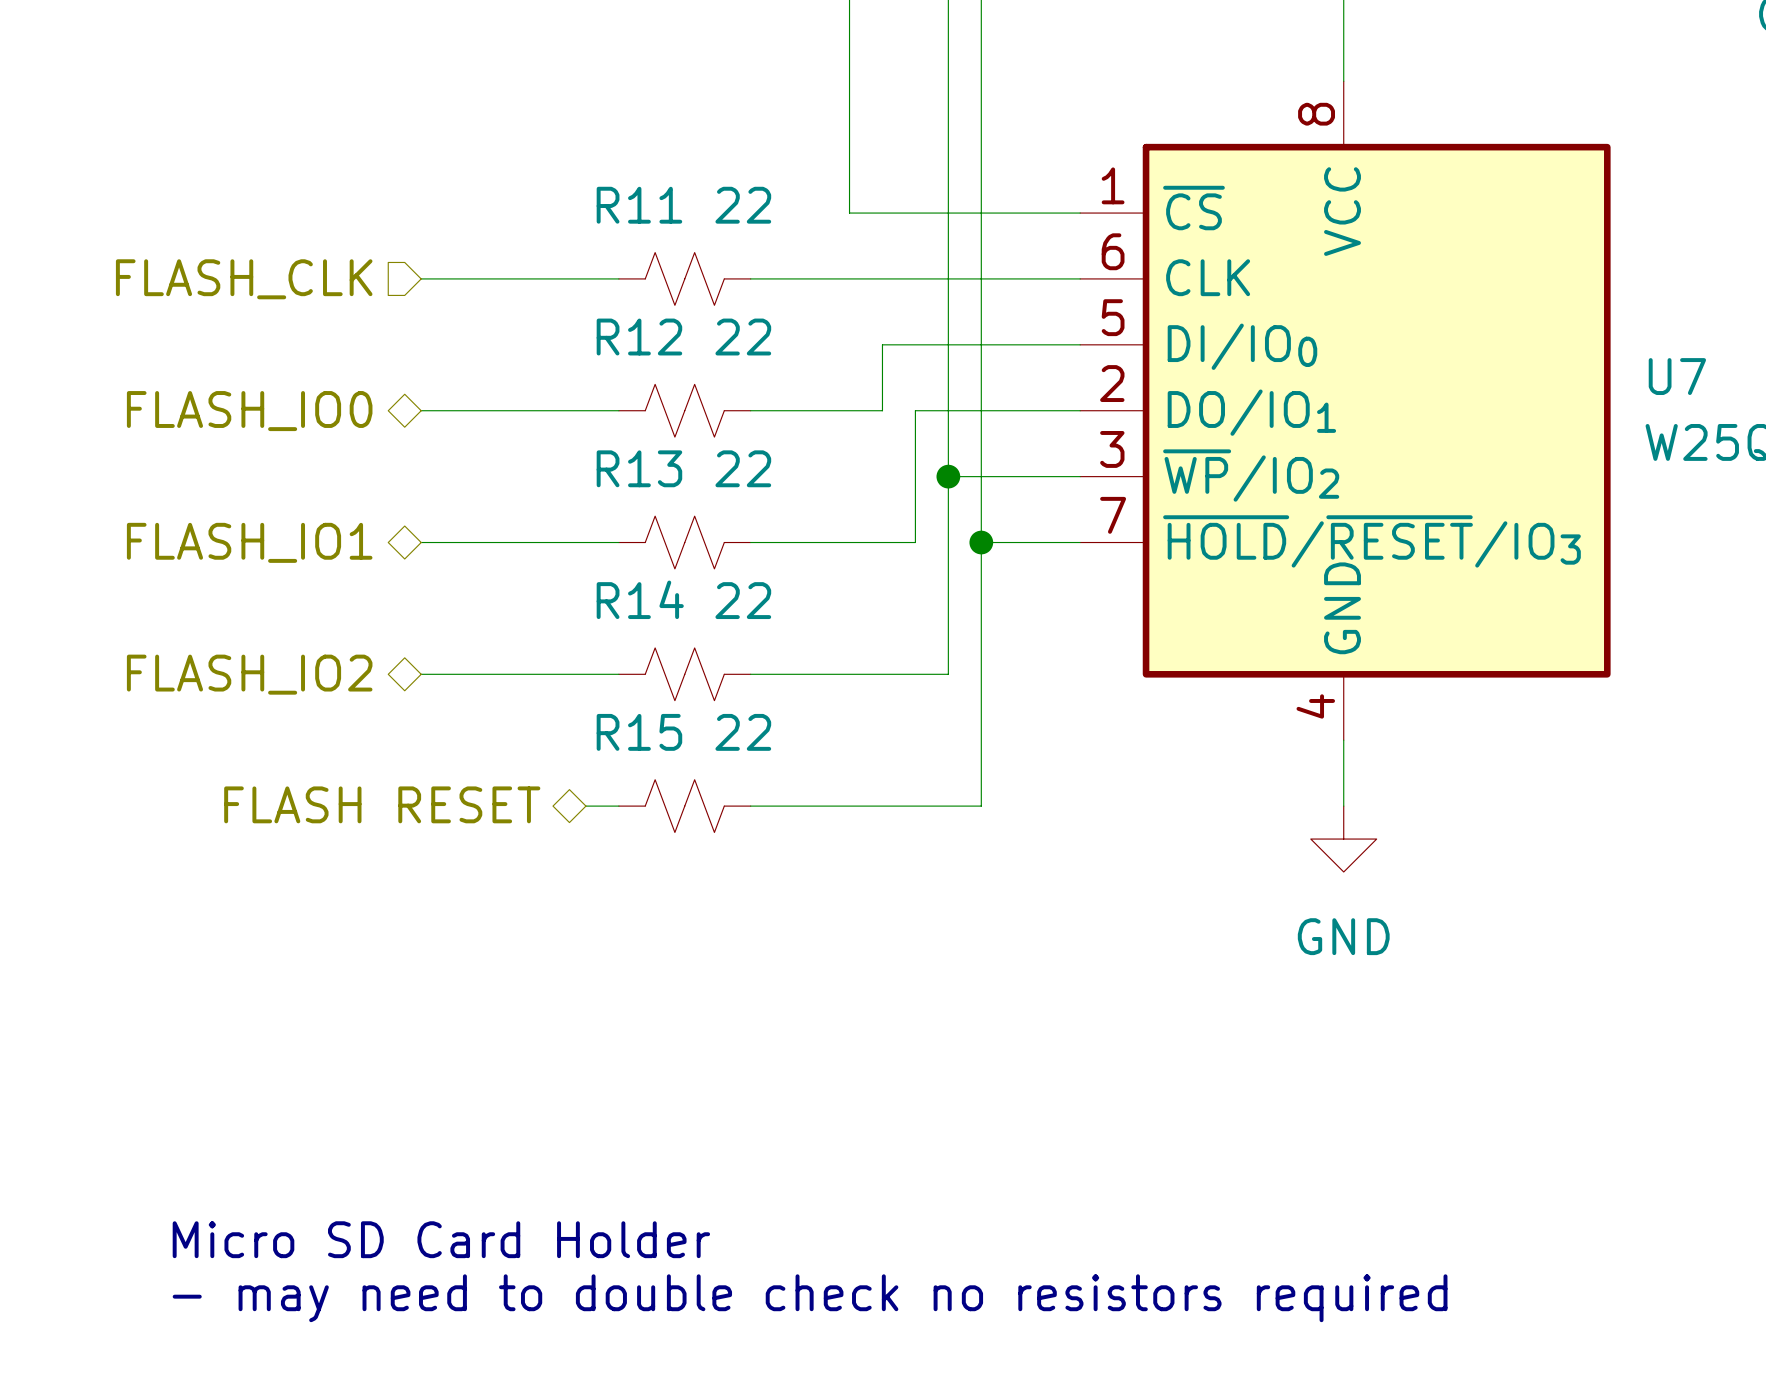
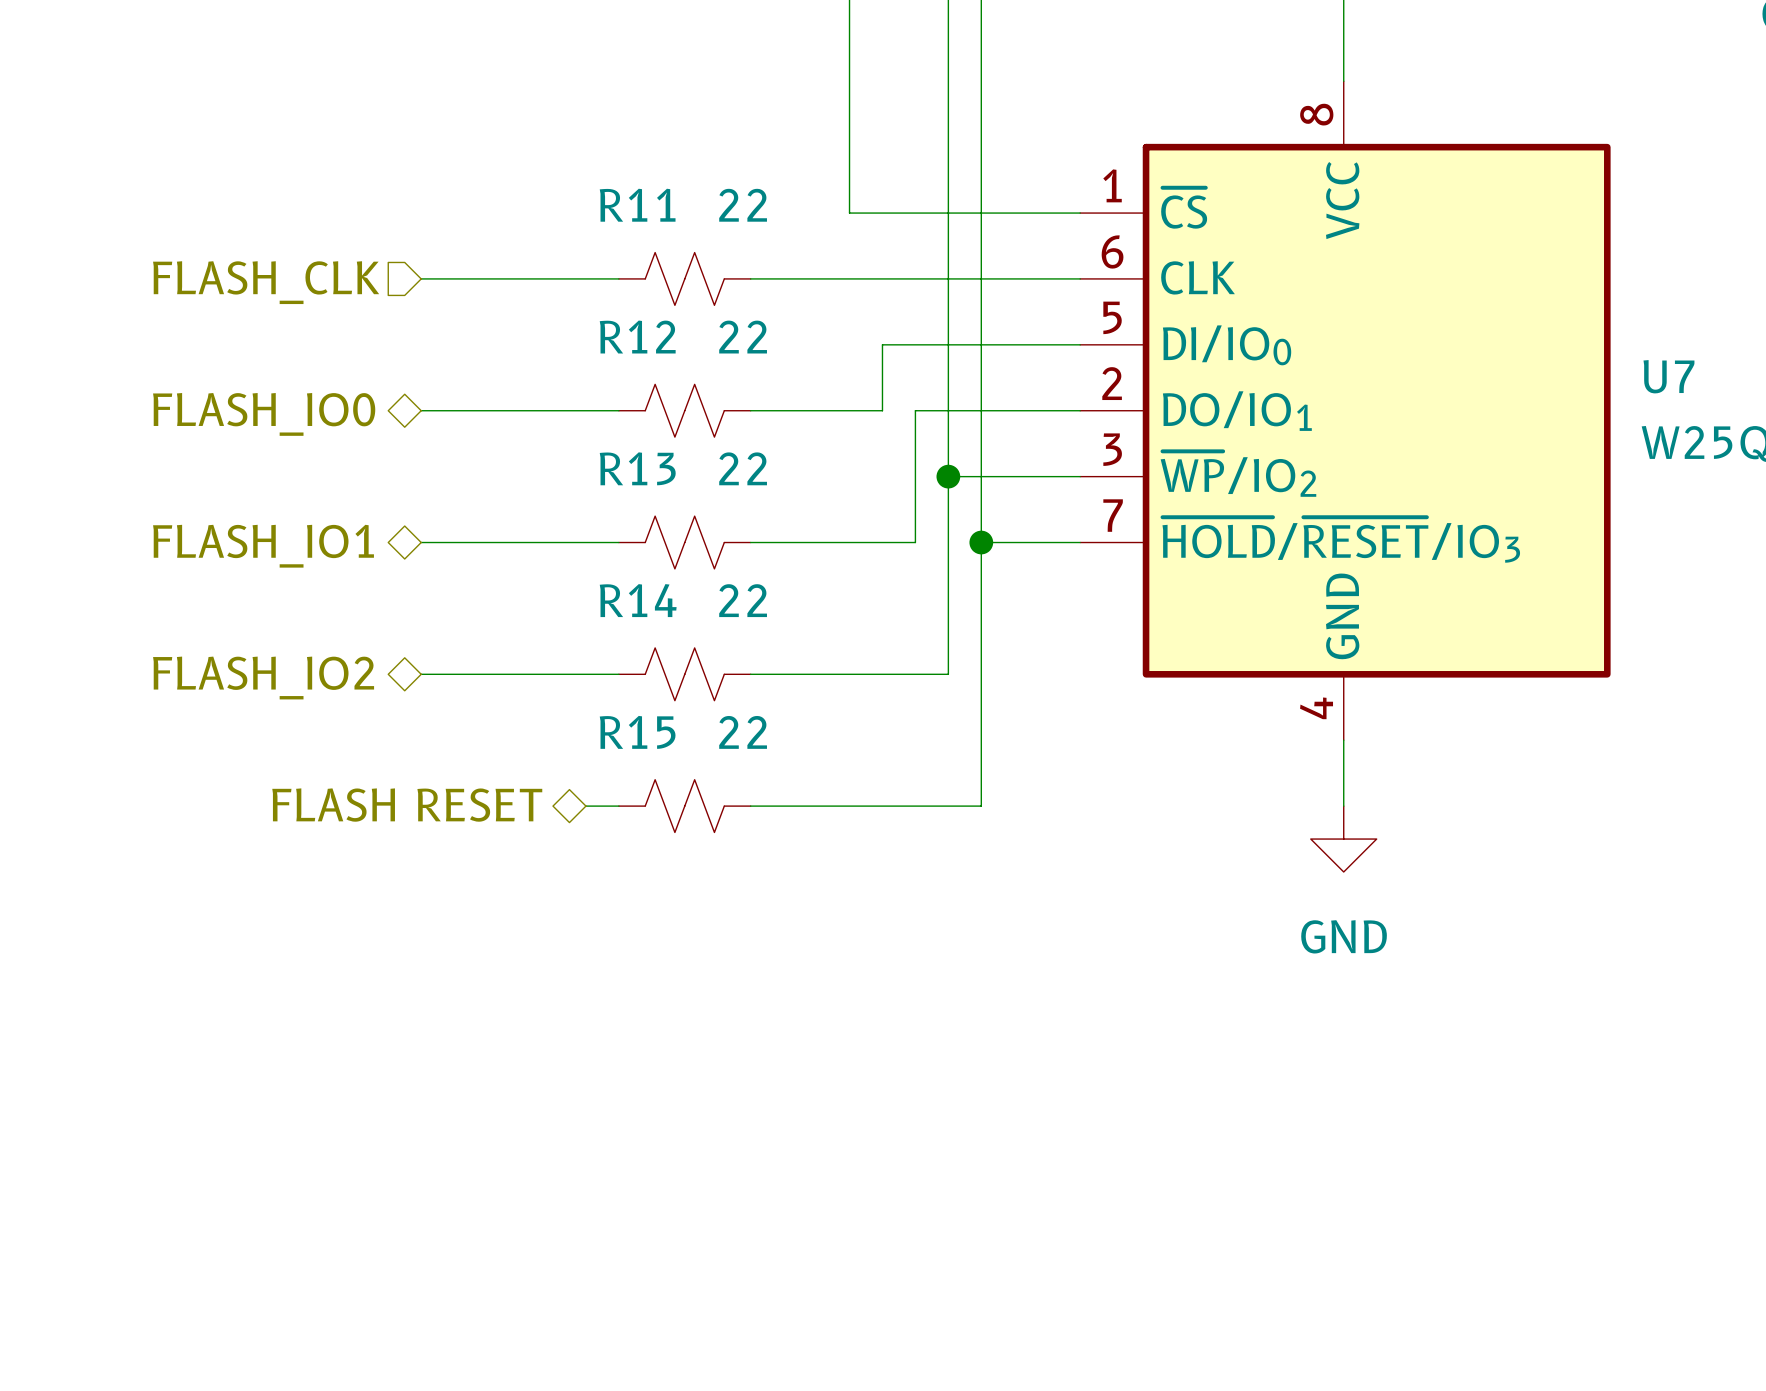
text: Micro SD Card Holder (441, 1239) -> none
text: - may need to double check no resistors required (810, 1298) -> none

